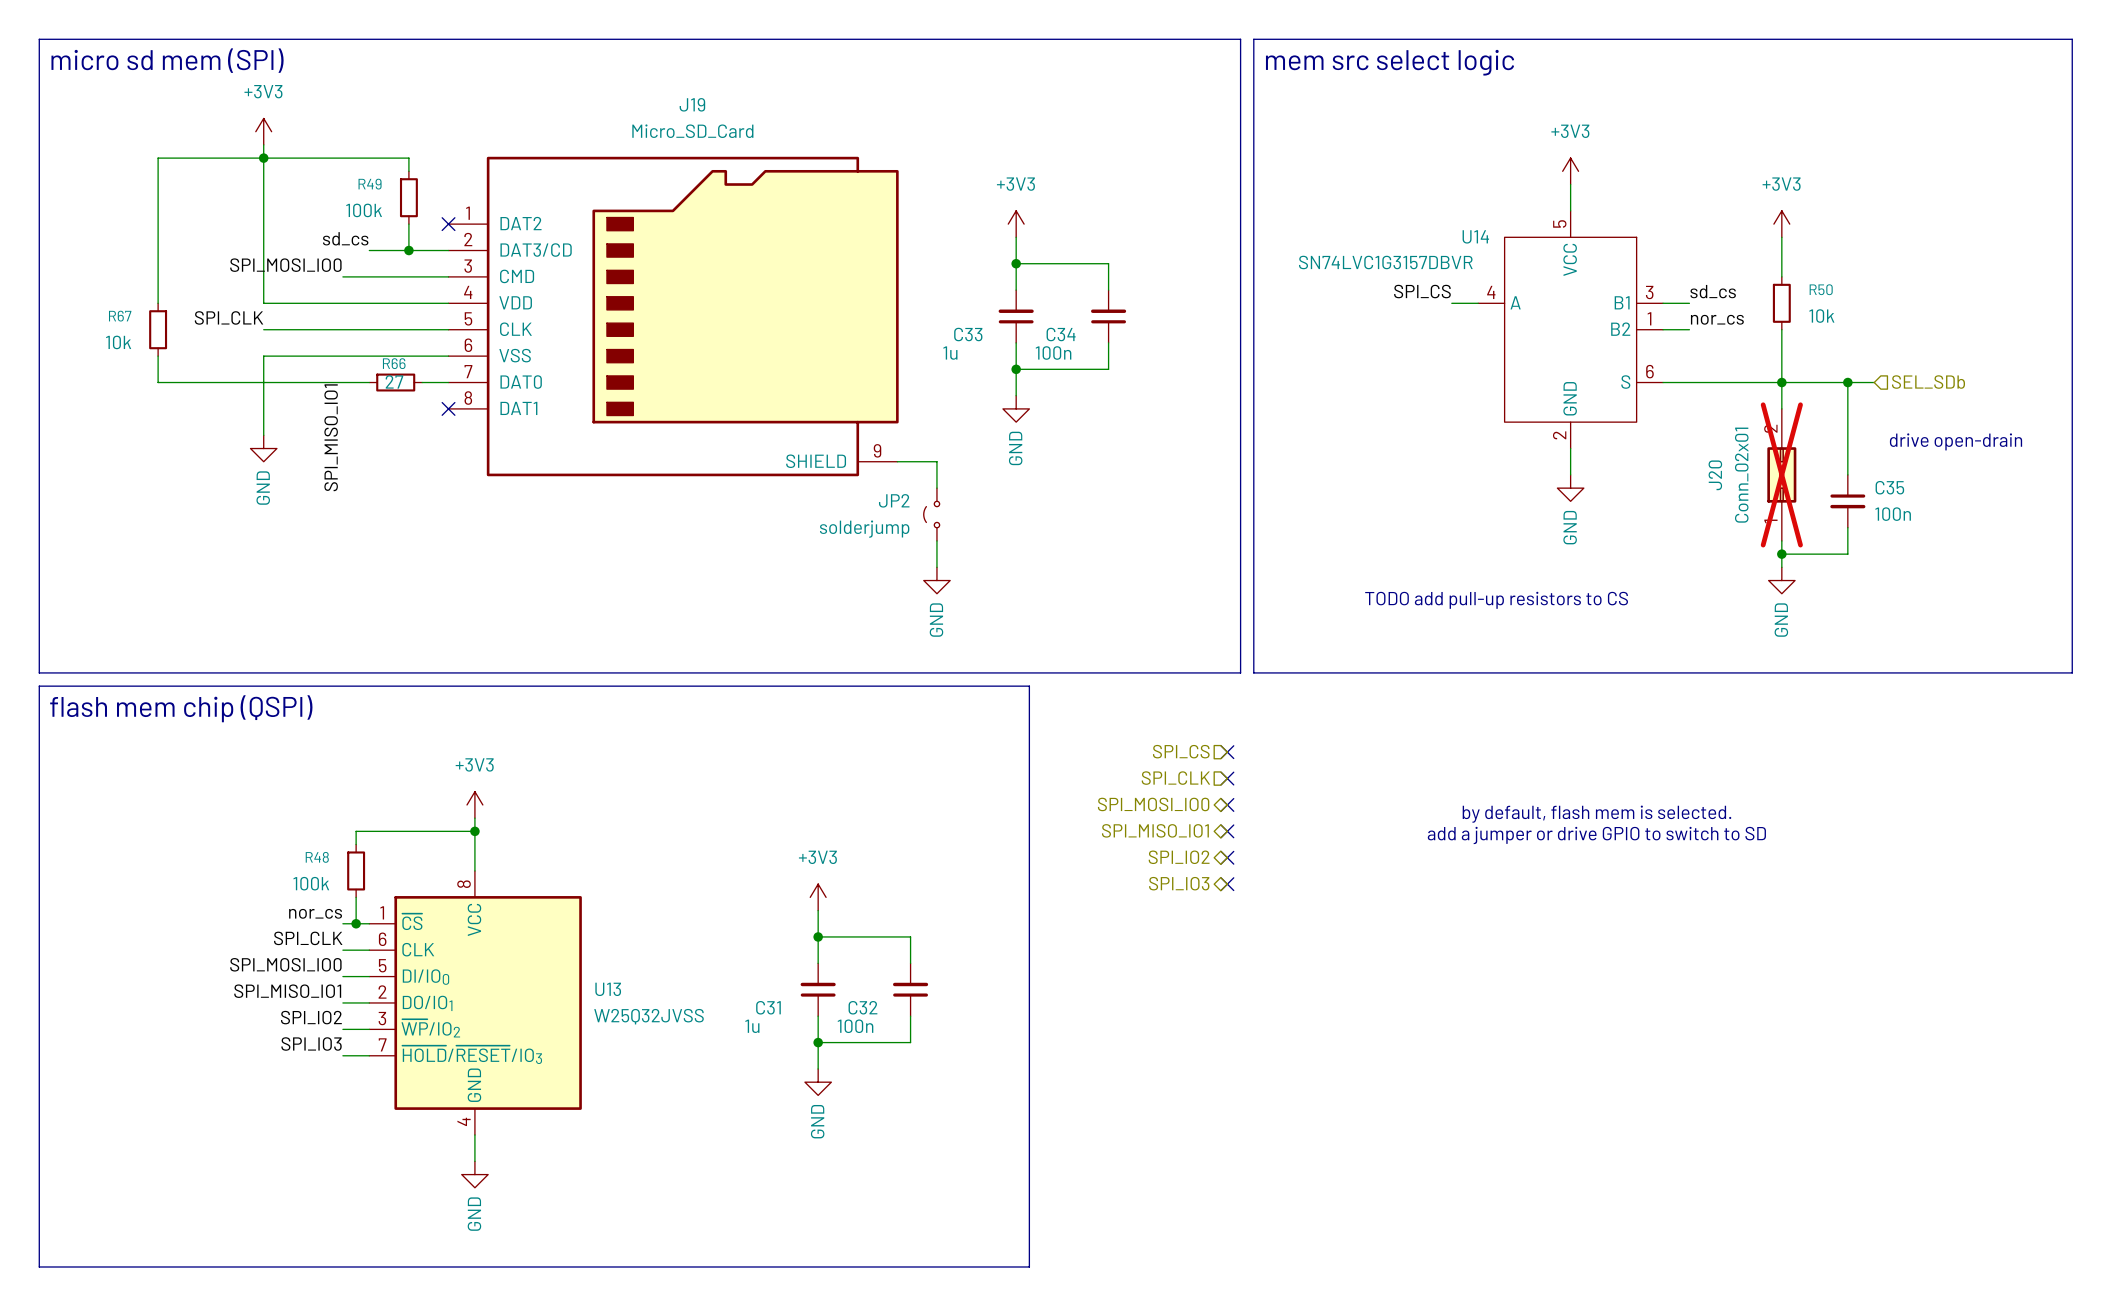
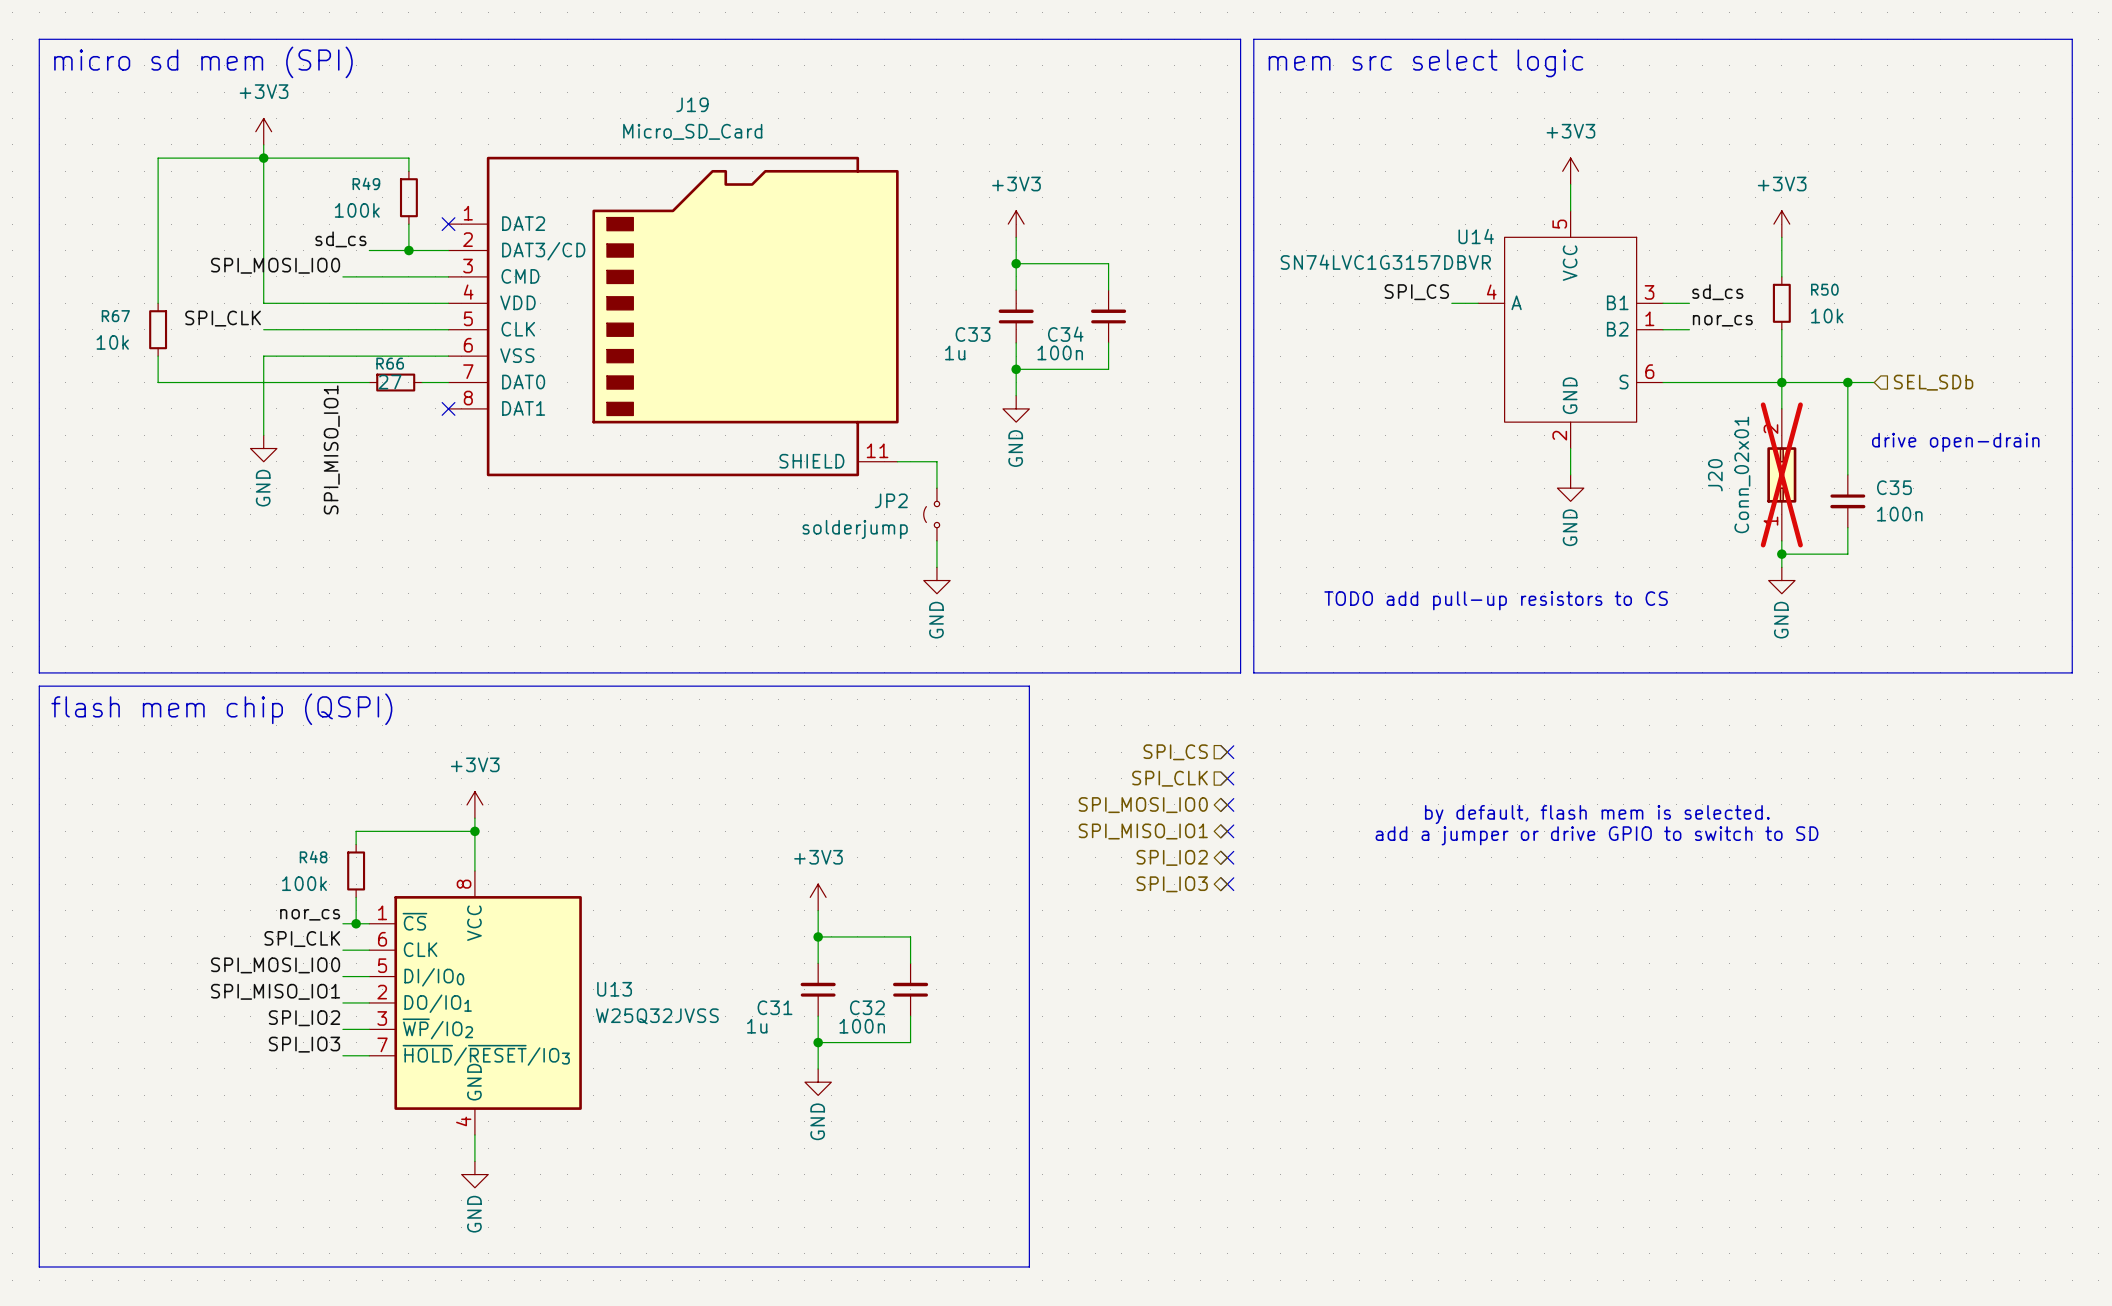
J19 pin number: 9 (877, 450) -> 11 (877, 450)

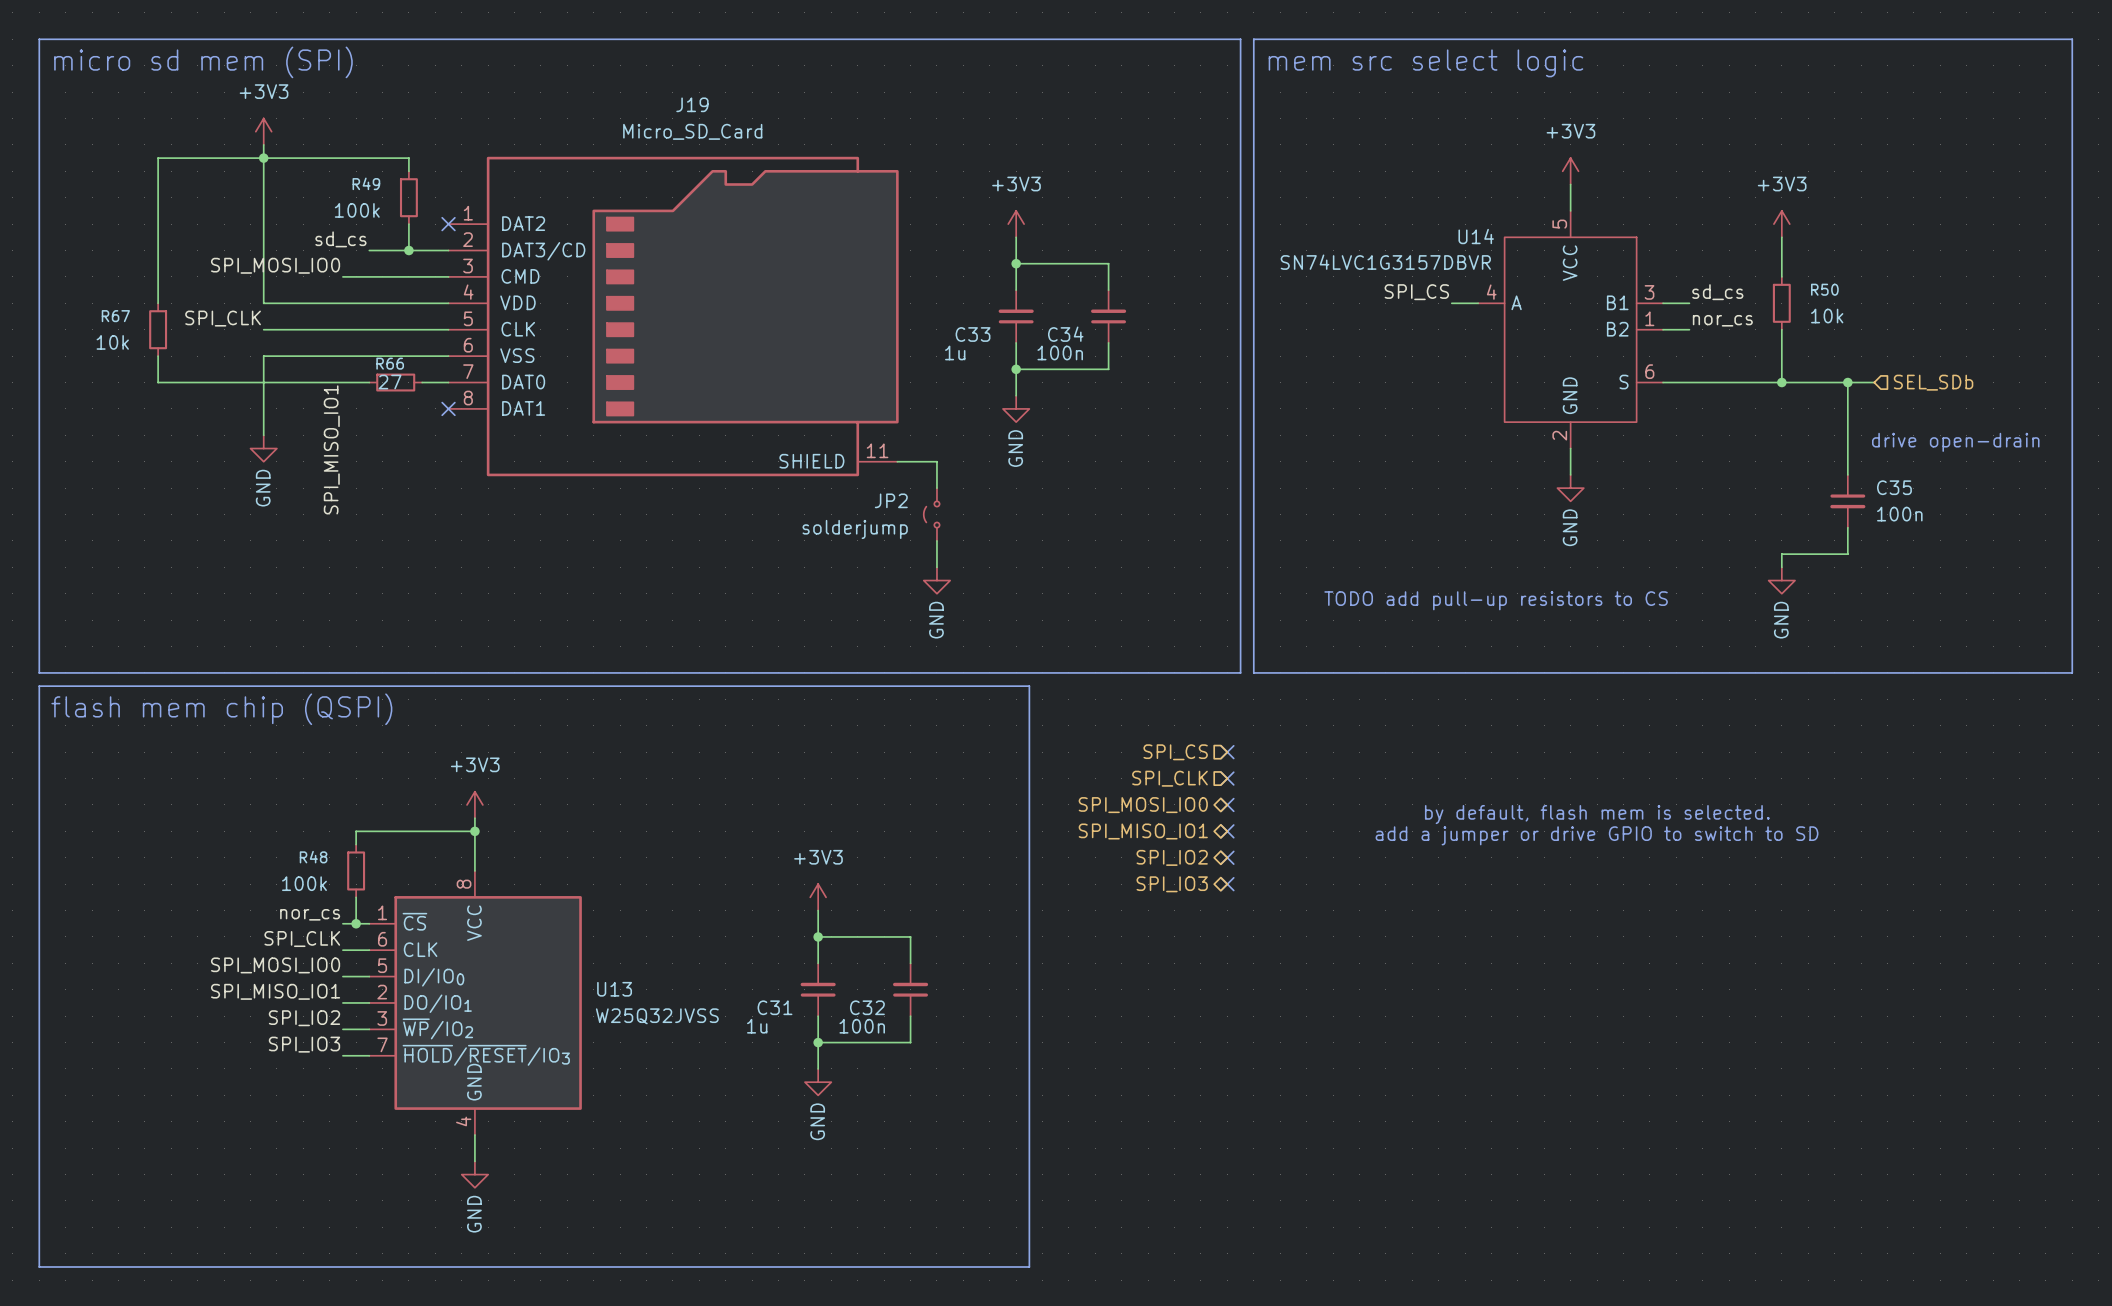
wire: (1781, 382) (1781, 408) -> none
J20: Conn_02x01 (1781, 474) -> none
wire: (1781, 540) (1781, 554) -> none
junction: (1781, 554) -> none

